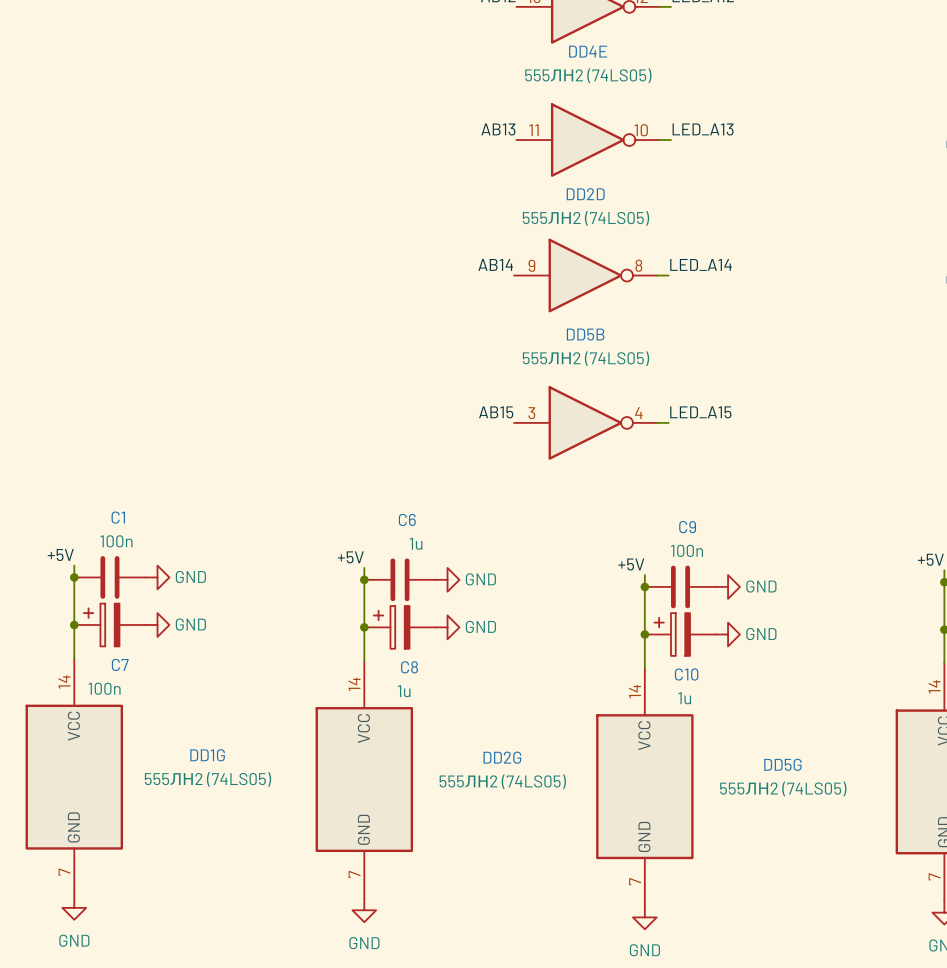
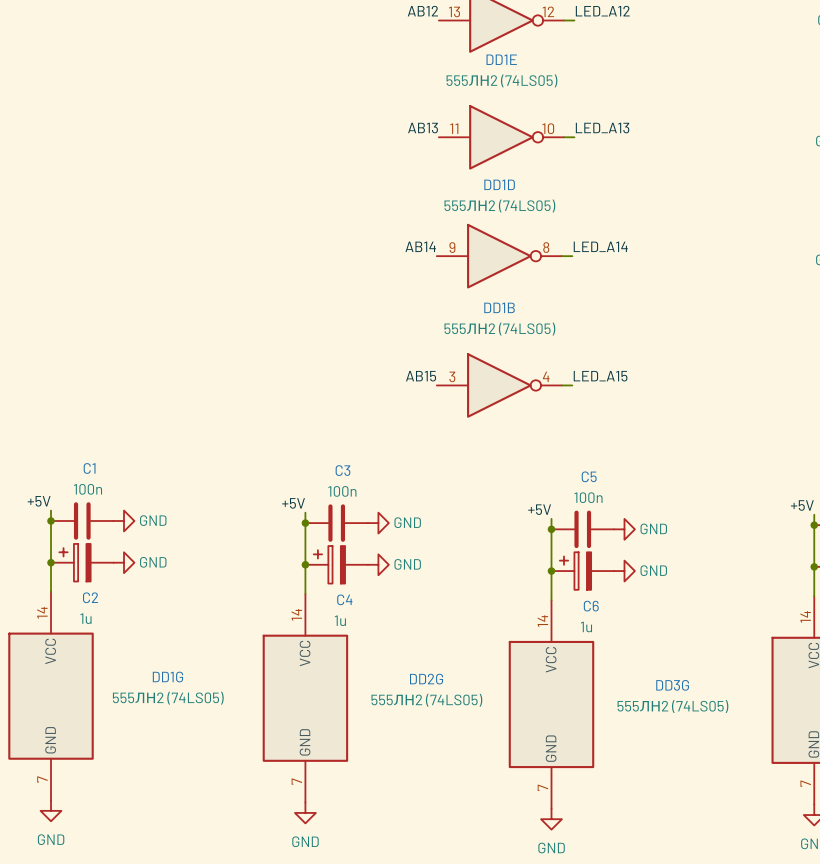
DD4E name: DD4E (588, 51) -> DD1E (501, 59)
DD2D name: DD2D (585, 194) -> DD1D (499, 184)
DD5B name: DD5B (585, 334) -> DD1B (499, 307)
C6 name: C6 (407, 519) -> C3 (342, 470)
C9 name: C9 (687, 527) -> C5 (589, 476)
C6 value: 1u (416, 543) -> 100n (342, 491)
C7 name: C7 (120, 664) -> C2 (90, 597)
C8 name: C8 (409, 667) -> C4 (344, 599)
C10 name: C10 (686, 674) -> C6 (591, 606)
C7 value: 100n (104, 688) -> 1u (85, 618)
DD5G name: DD5G (782, 764) -> DD3G (672, 685)

